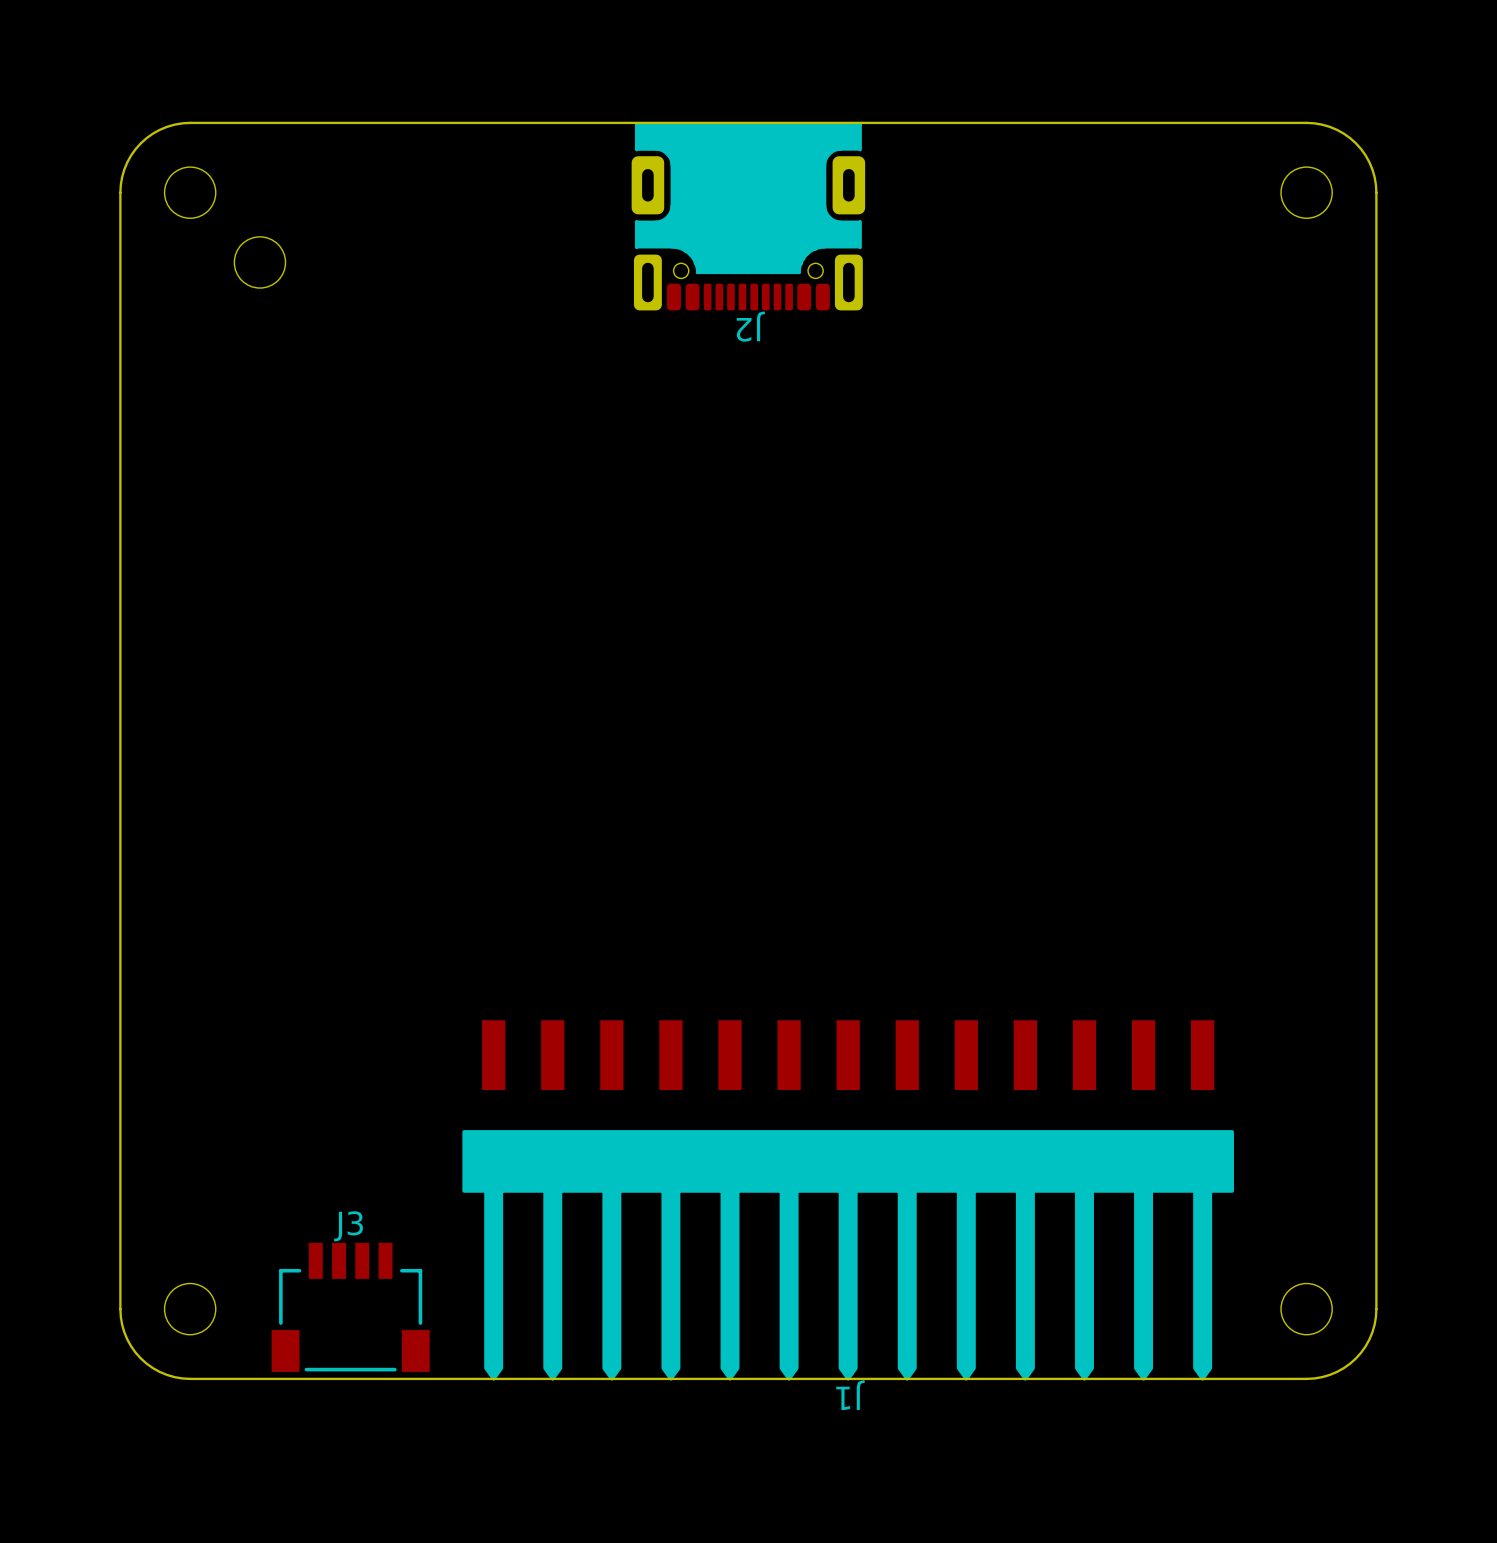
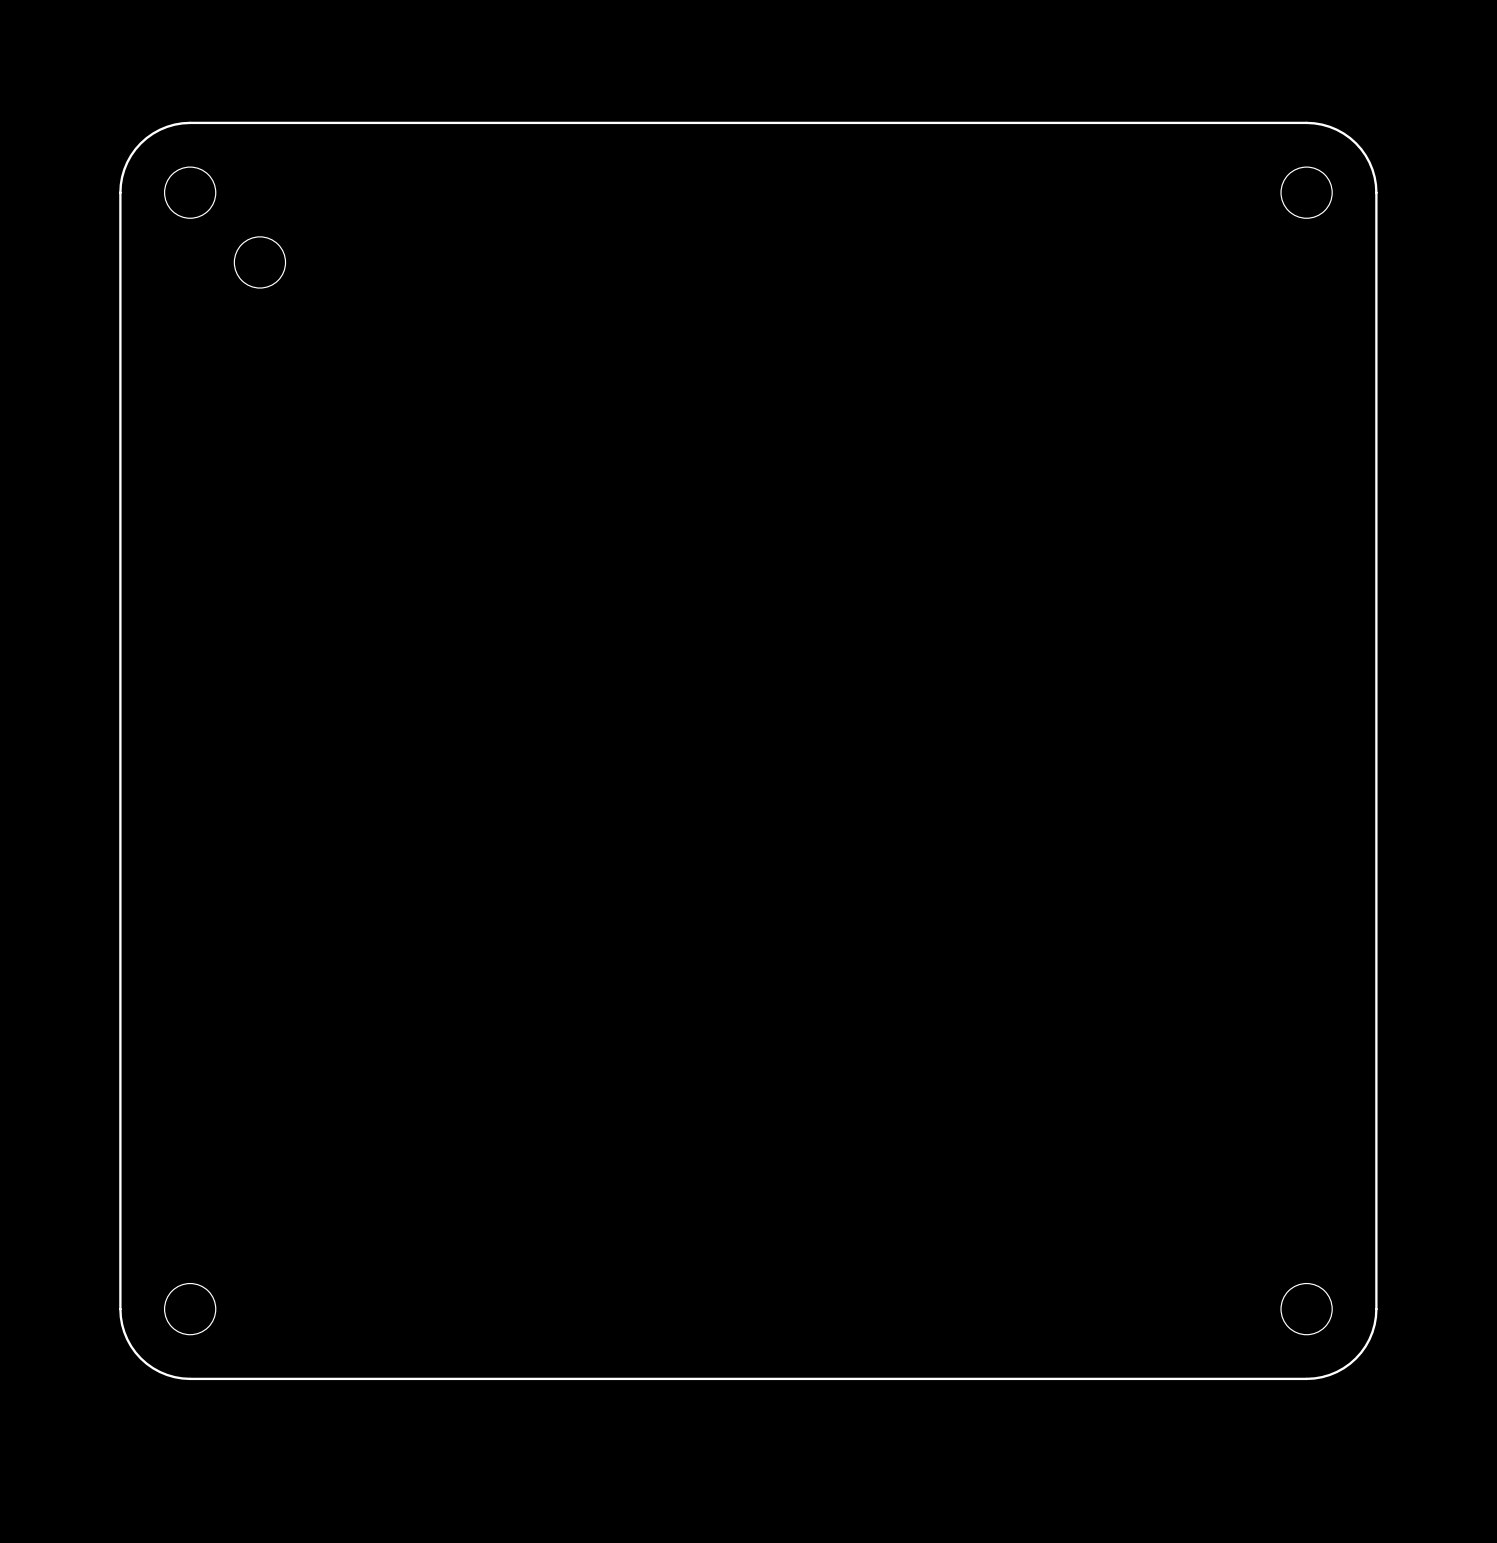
J2: (748, 216) -> none
J1: (848, 1200) -> none
J3: (350, 1307) -> none

